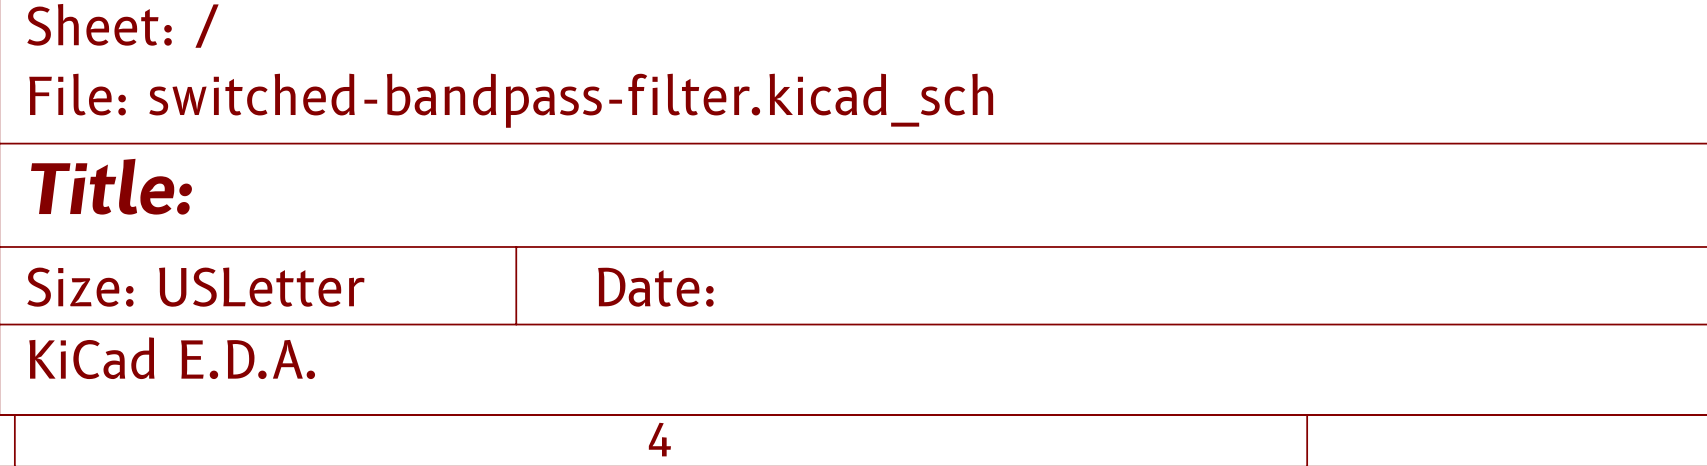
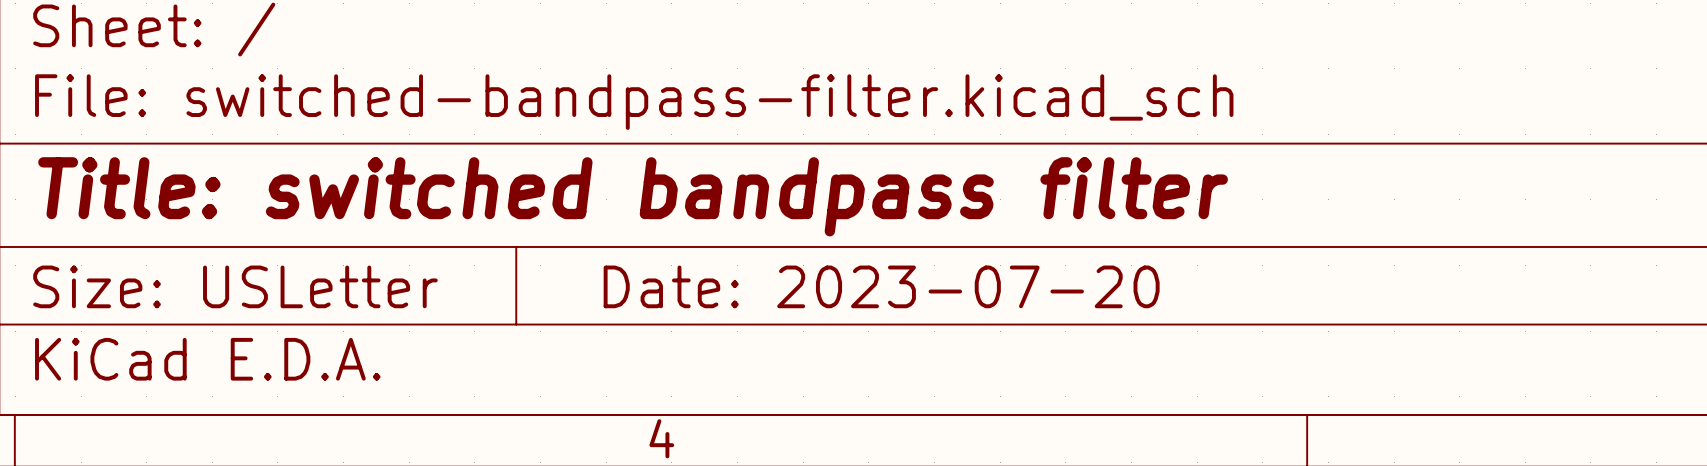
title block: Title: (111, 186) -> Title: switched bandpass filter (633, 196)
title block: Date: (655, 287) -> Date: 2023-07-20 (881, 286)

